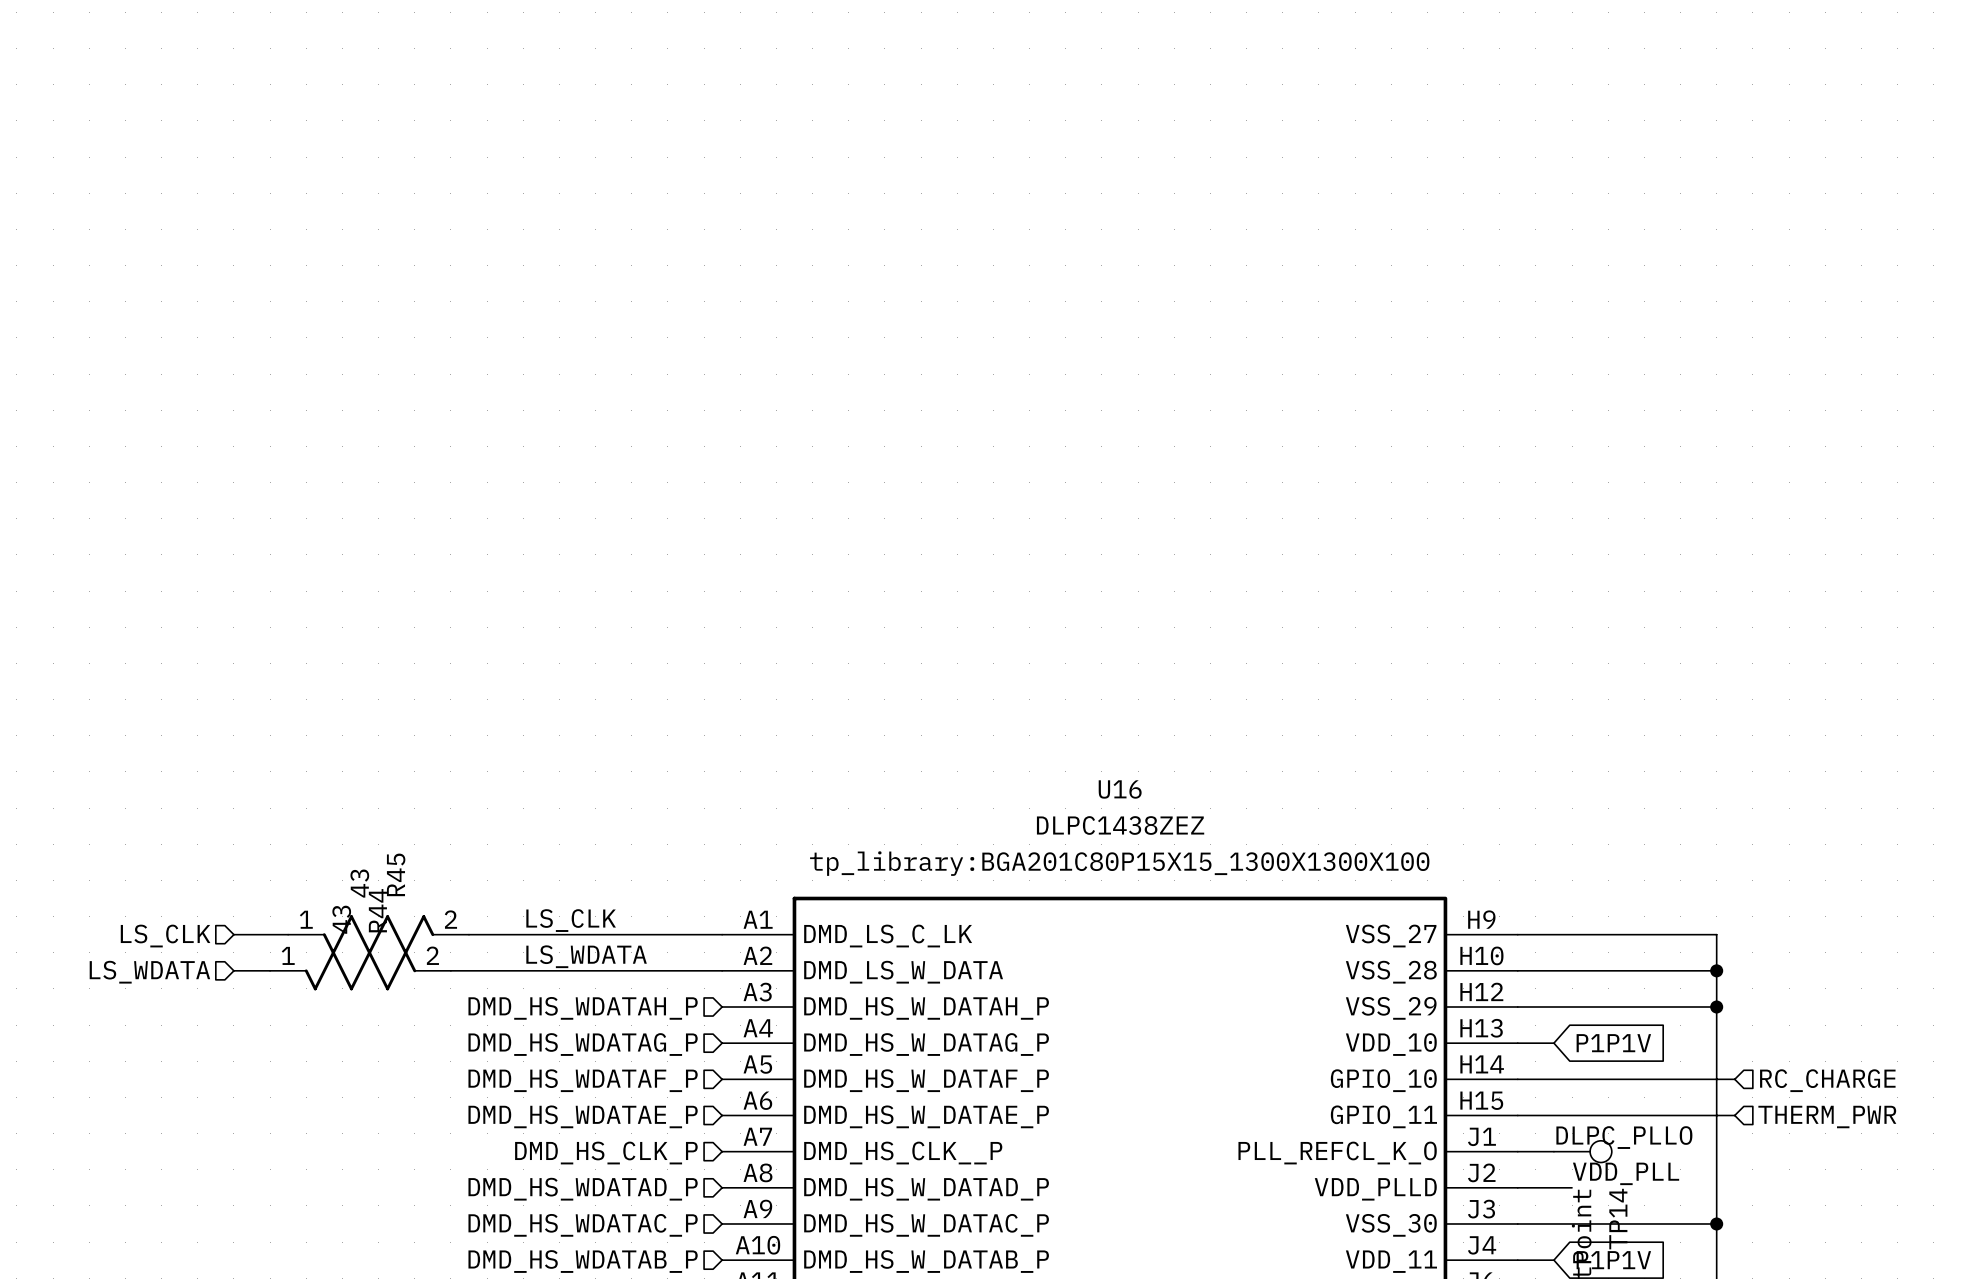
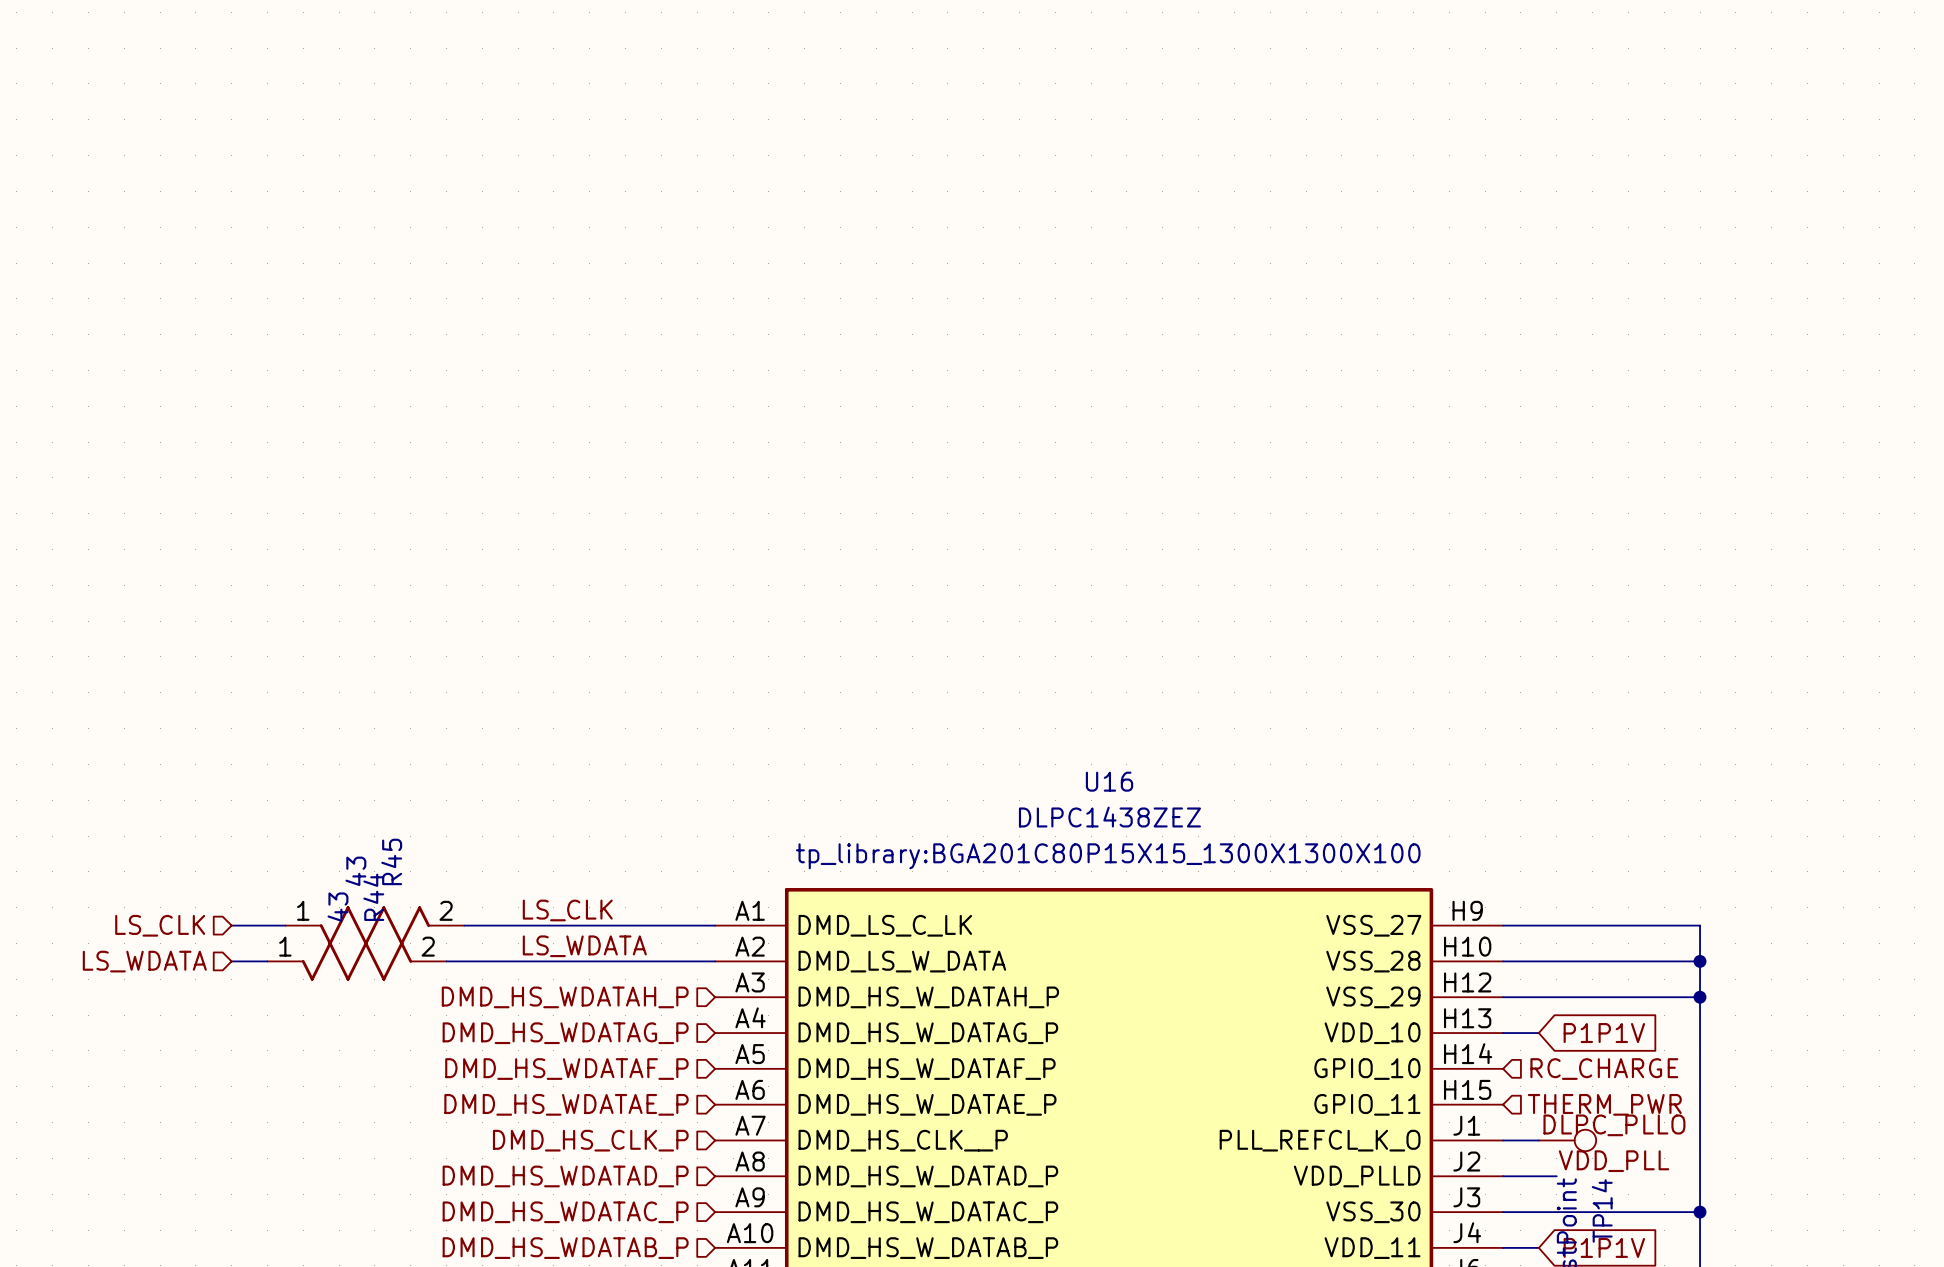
wire: (1517, 1079) (1734, 1079) -> none
hierarchical label position: RC_CHARGE (1827, 1080) -> RC_CHARGE (1604, 1069)
wire: (1517, 1115) (1734, 1115) -> none
hierarchical label position: THERM_PWR (1827, 1117) -> THERM_PWR (1604, 1104)

